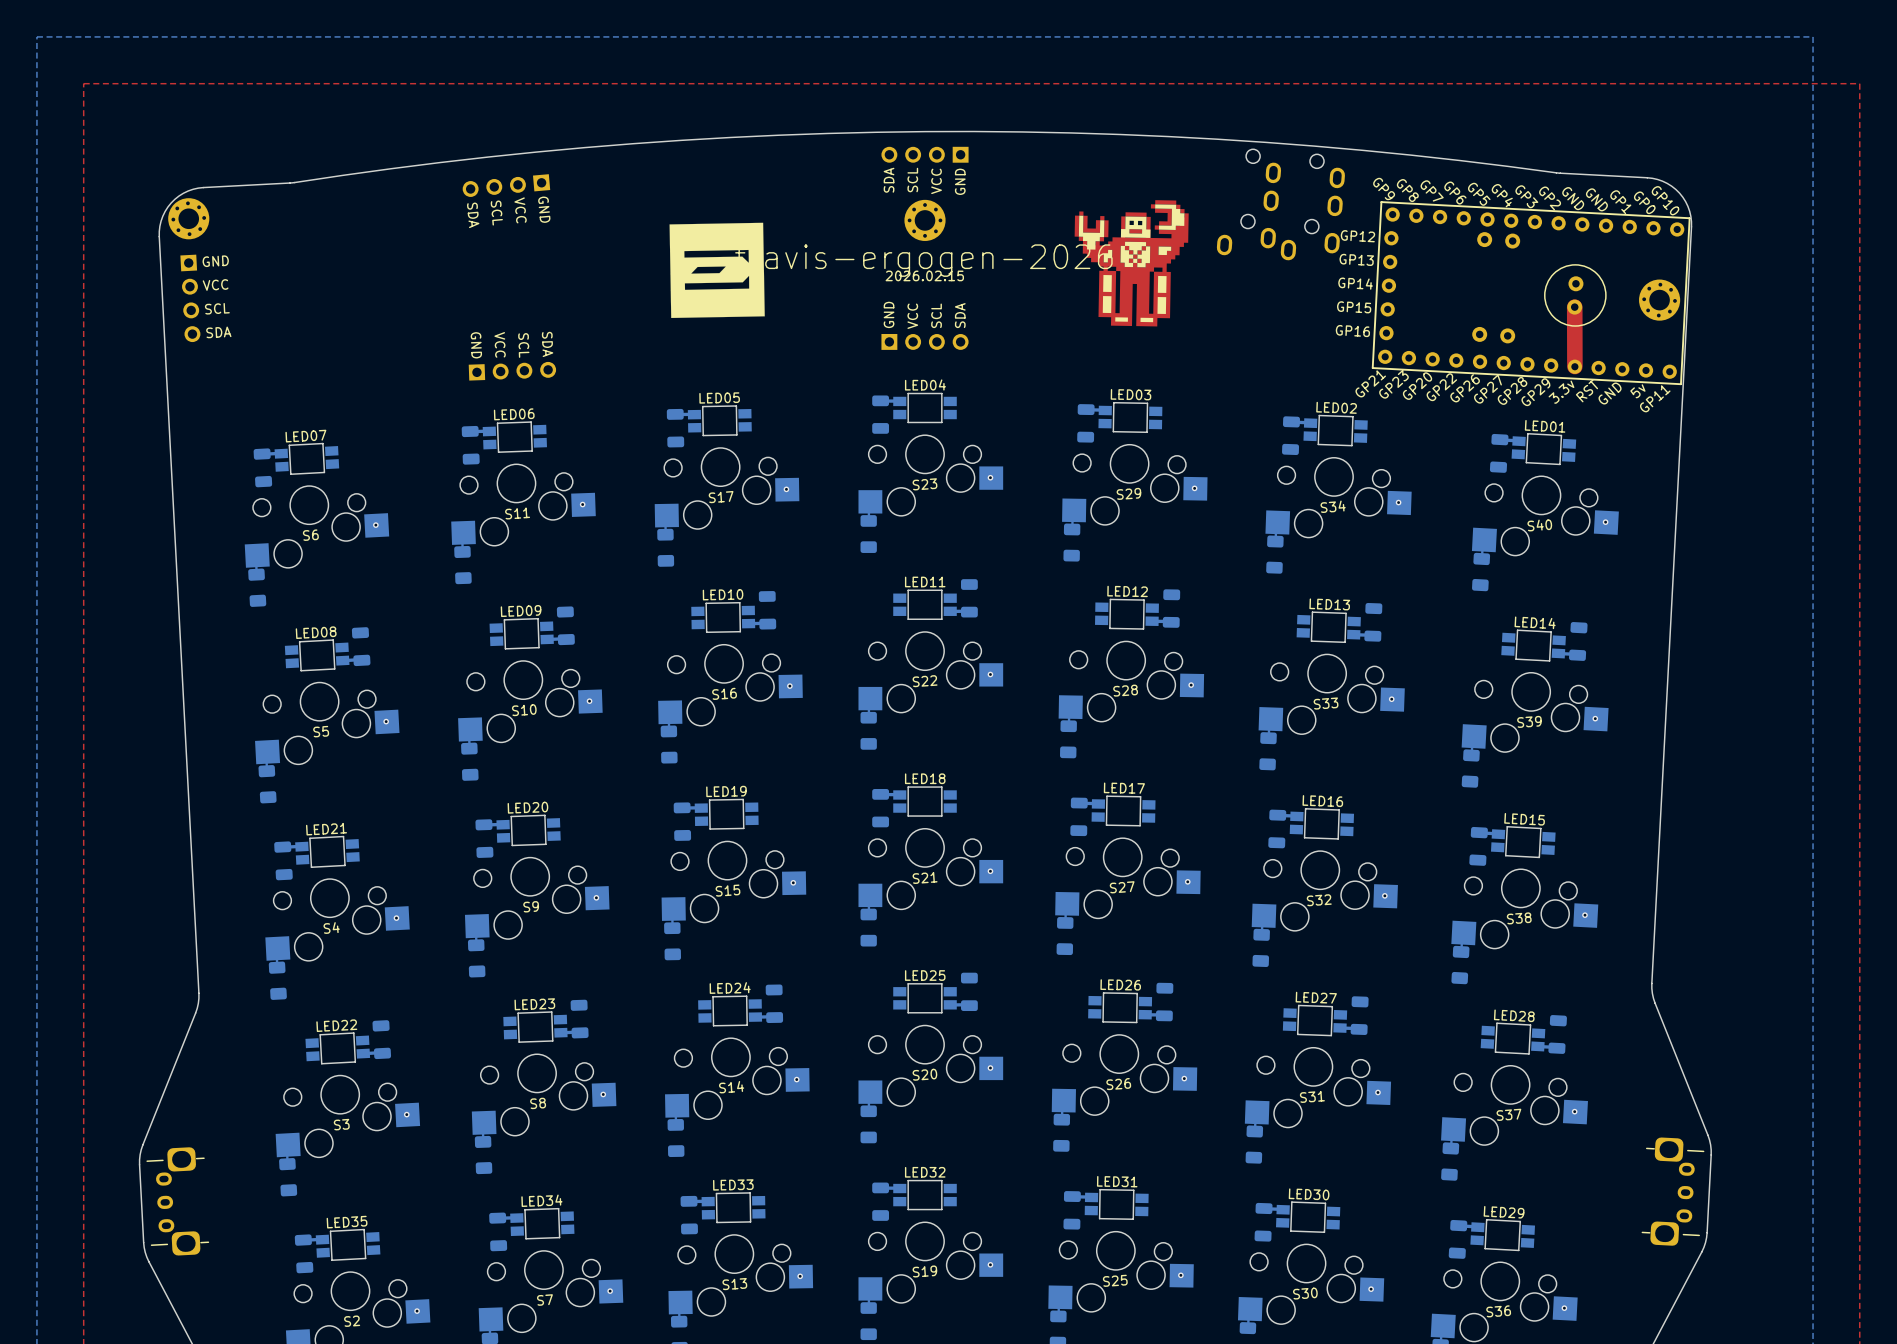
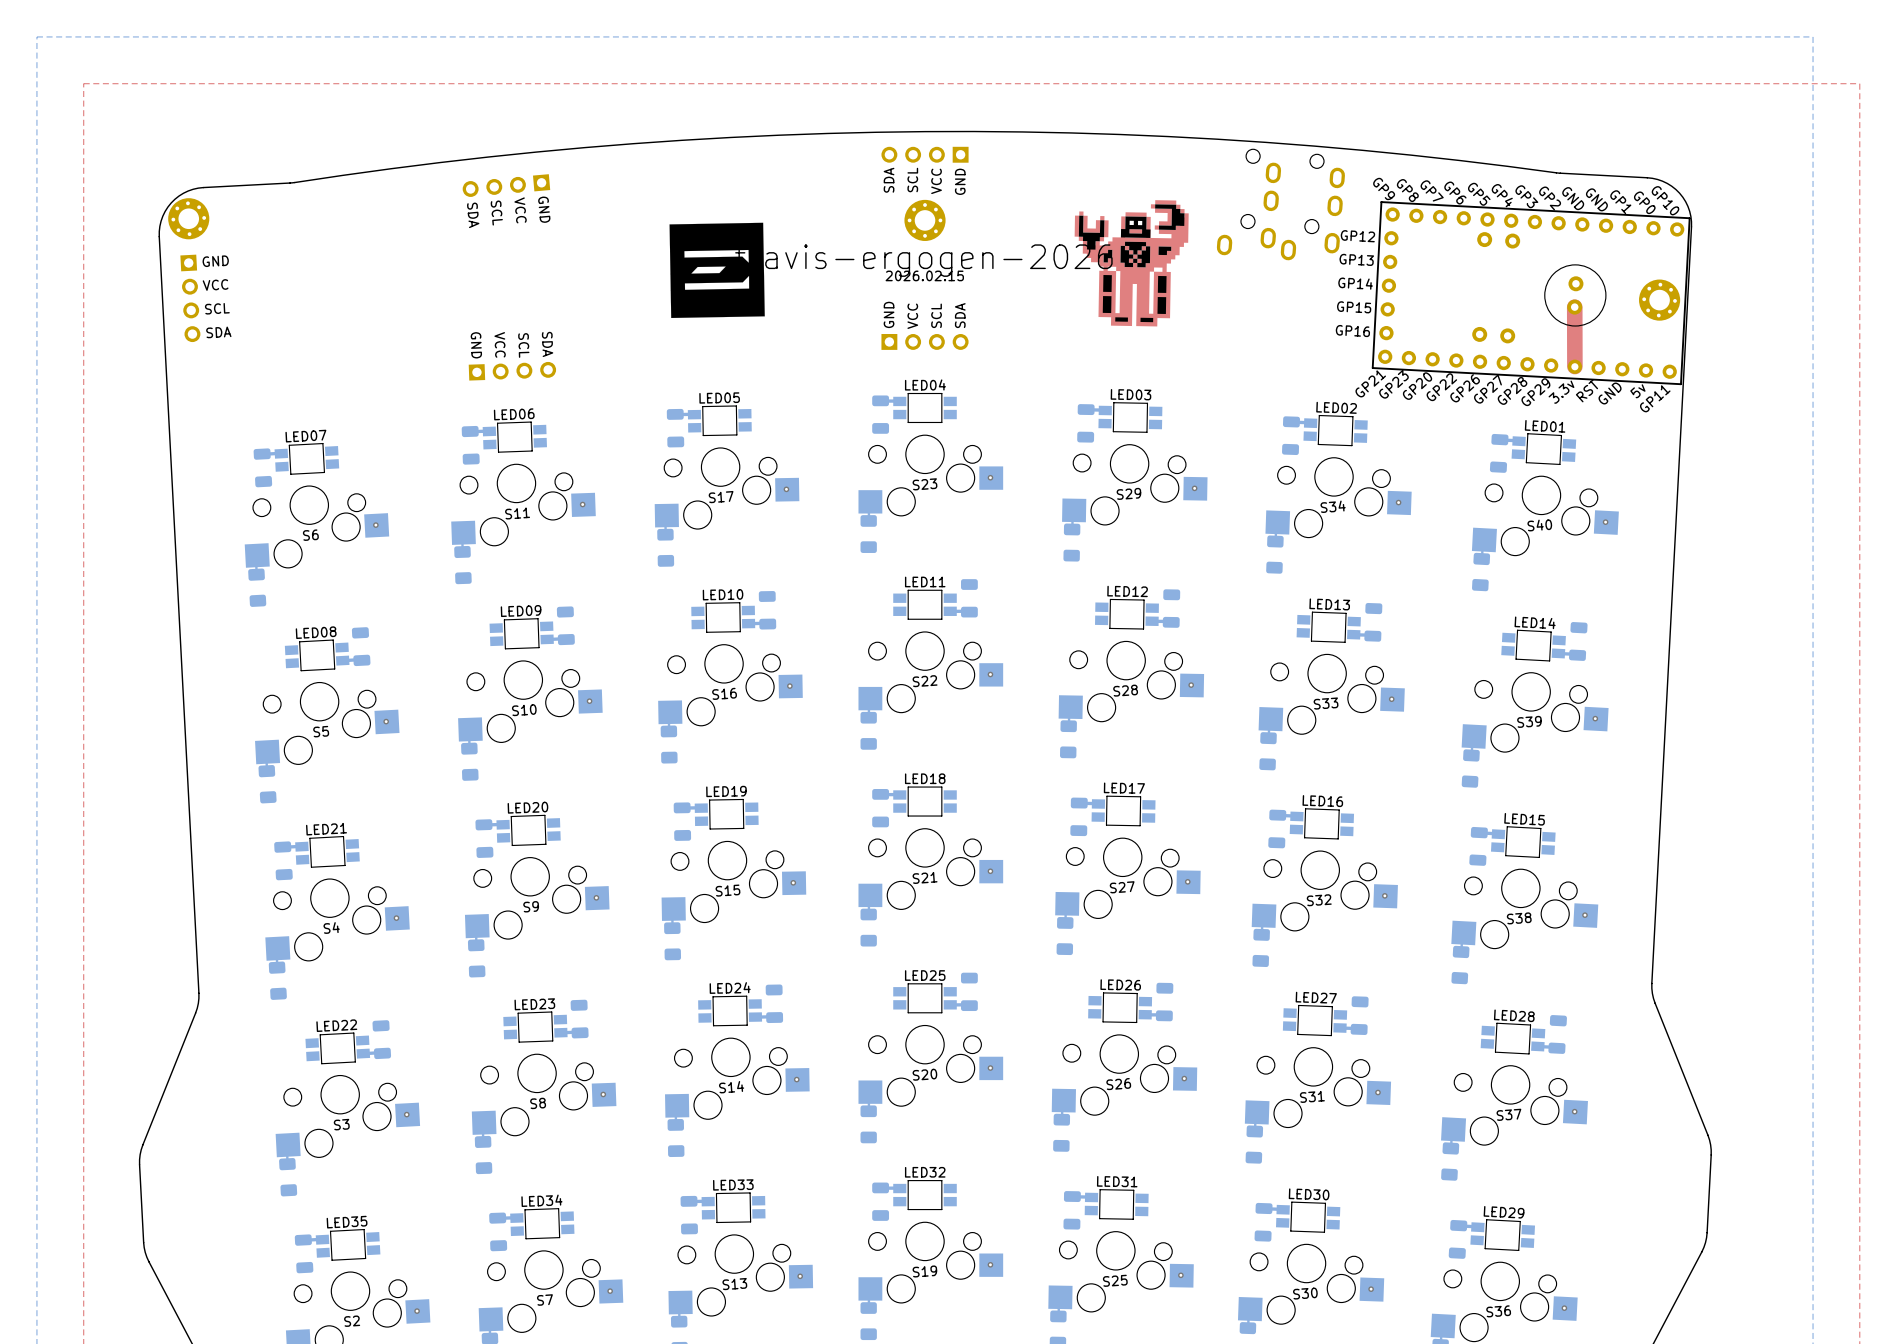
part: (1672, 1191) -> none
part: (177, 1201) -> none

